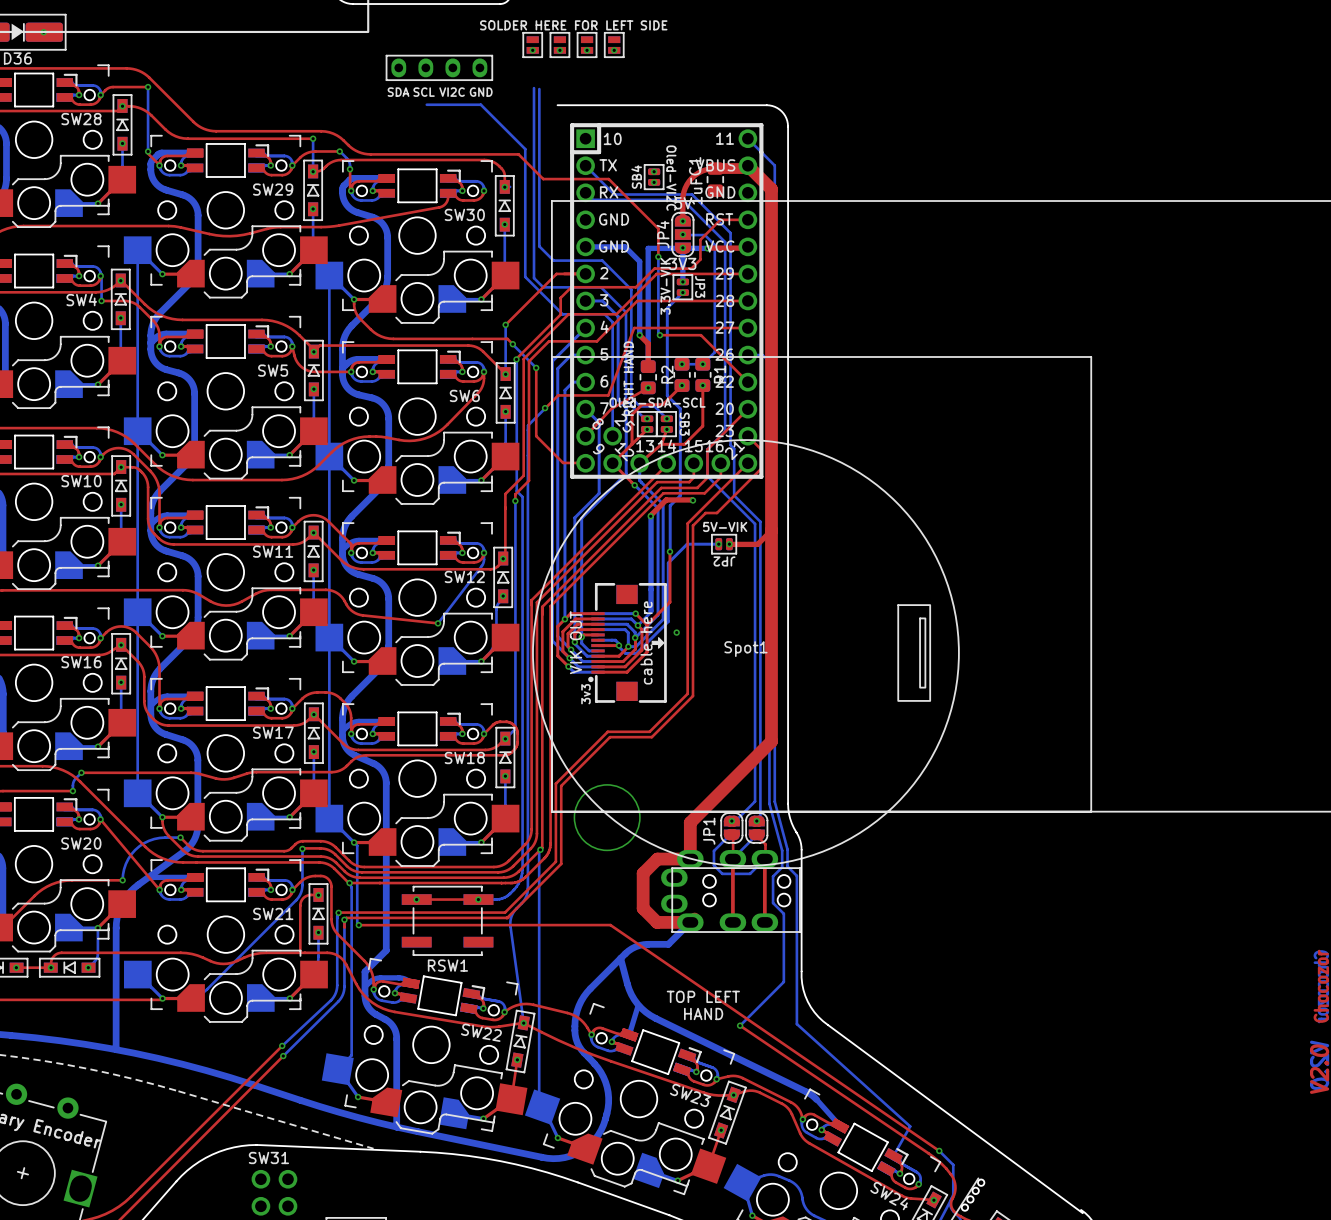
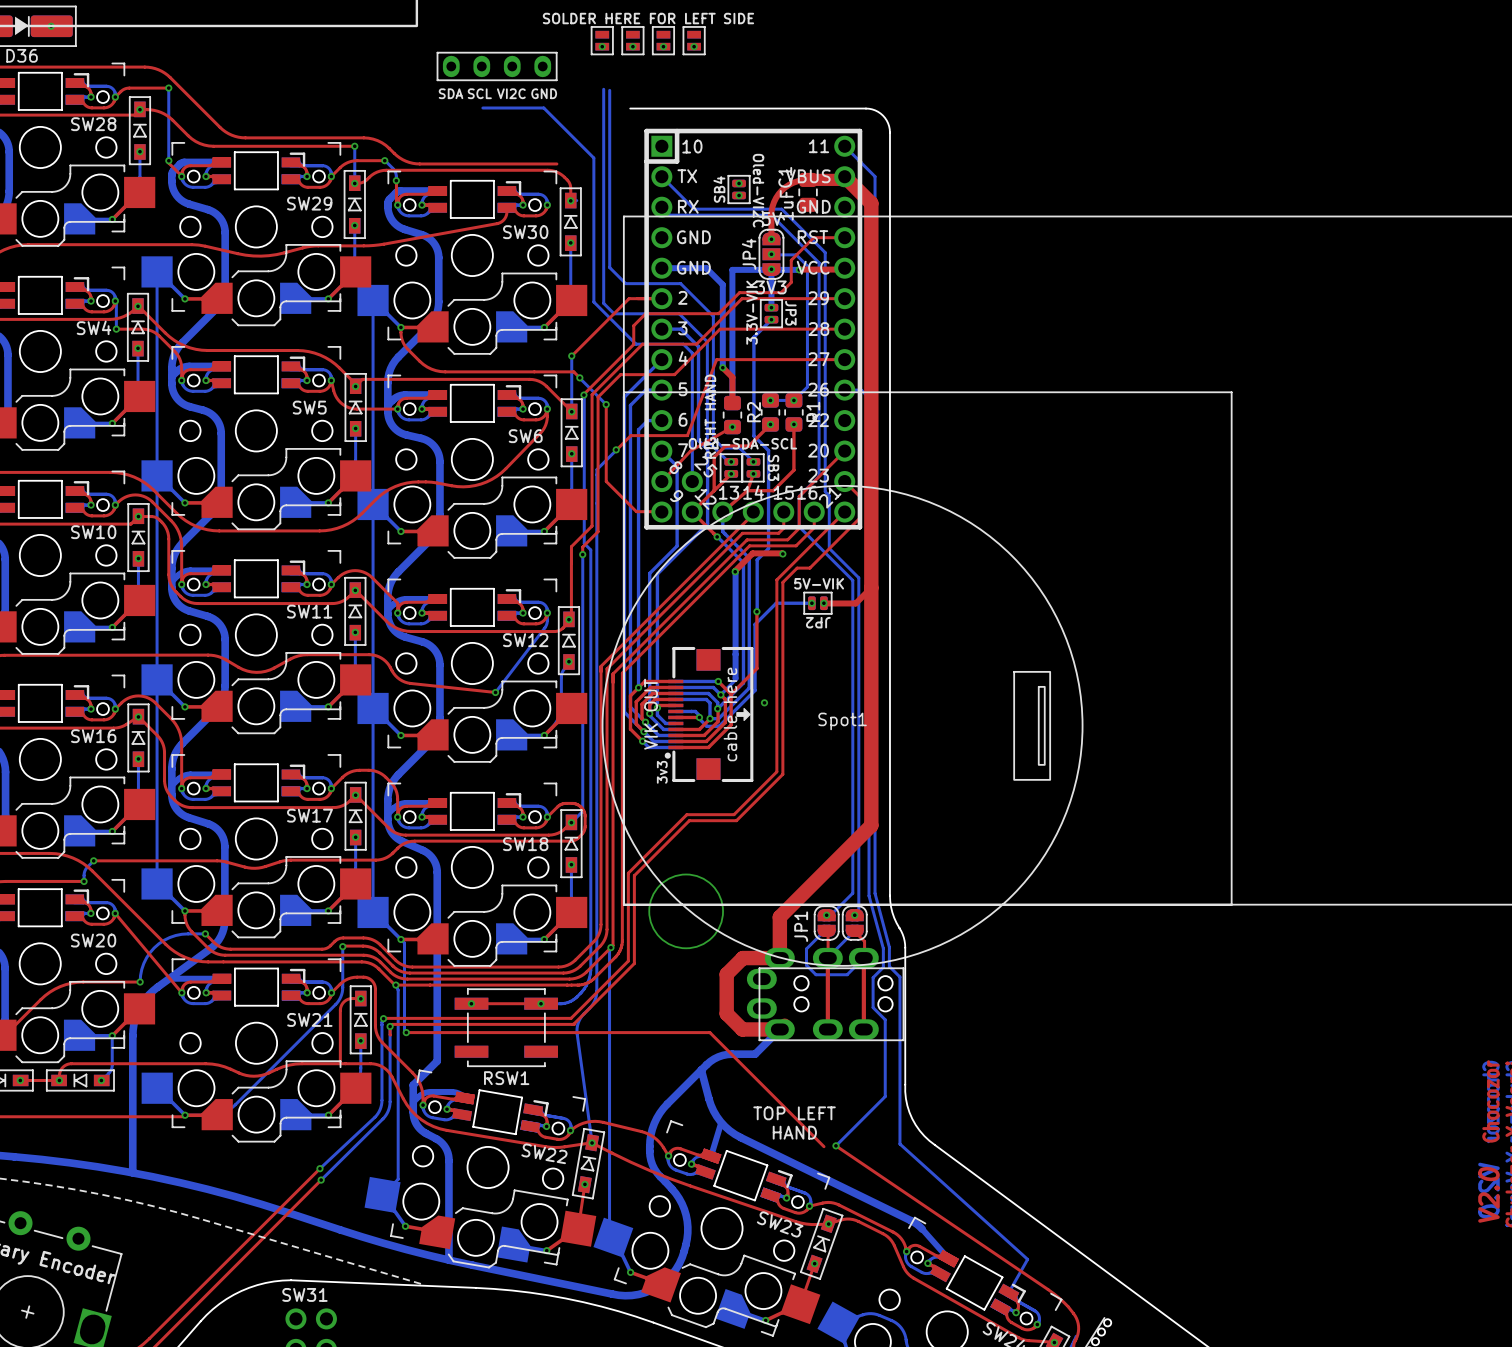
top track: (492, 154) (518, 154) (543, 179) (608, 179) (658, 228) (658, 256) -> none
bottom track: (658, 256) (658, 333) (659, 335) -> none
via: (658, 256) -> none
top track: (659, 335) (700, 335) (747, 382) -> none
via: (659, 335) -> none
top track: (358, 925) (610, 925) (939, 1150) -> (406, 1032) (709, 1032) (824, 1146)
bottom track: (939, 1150) (953, 1164) (953, 1194) -> none
via: (939, 1150) -> none

